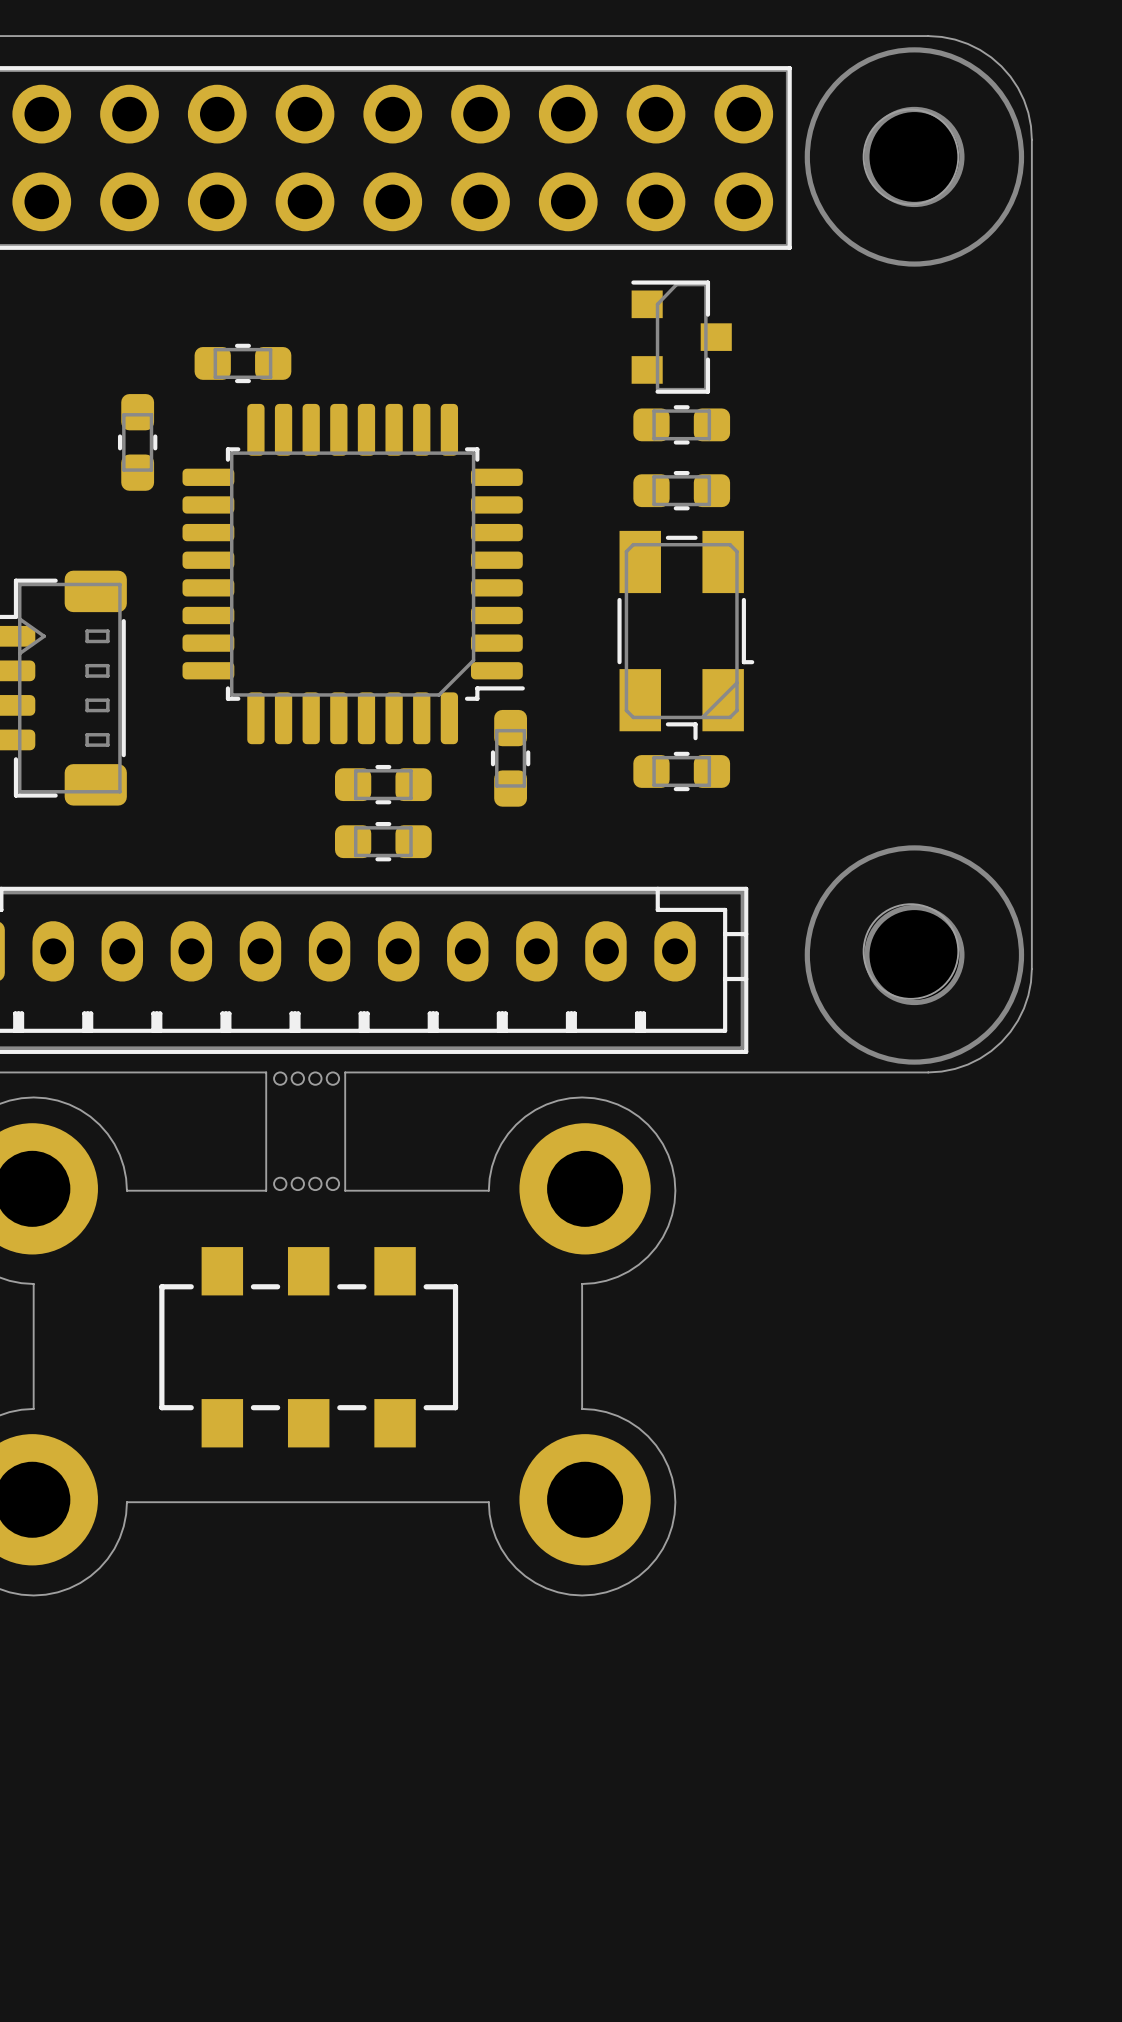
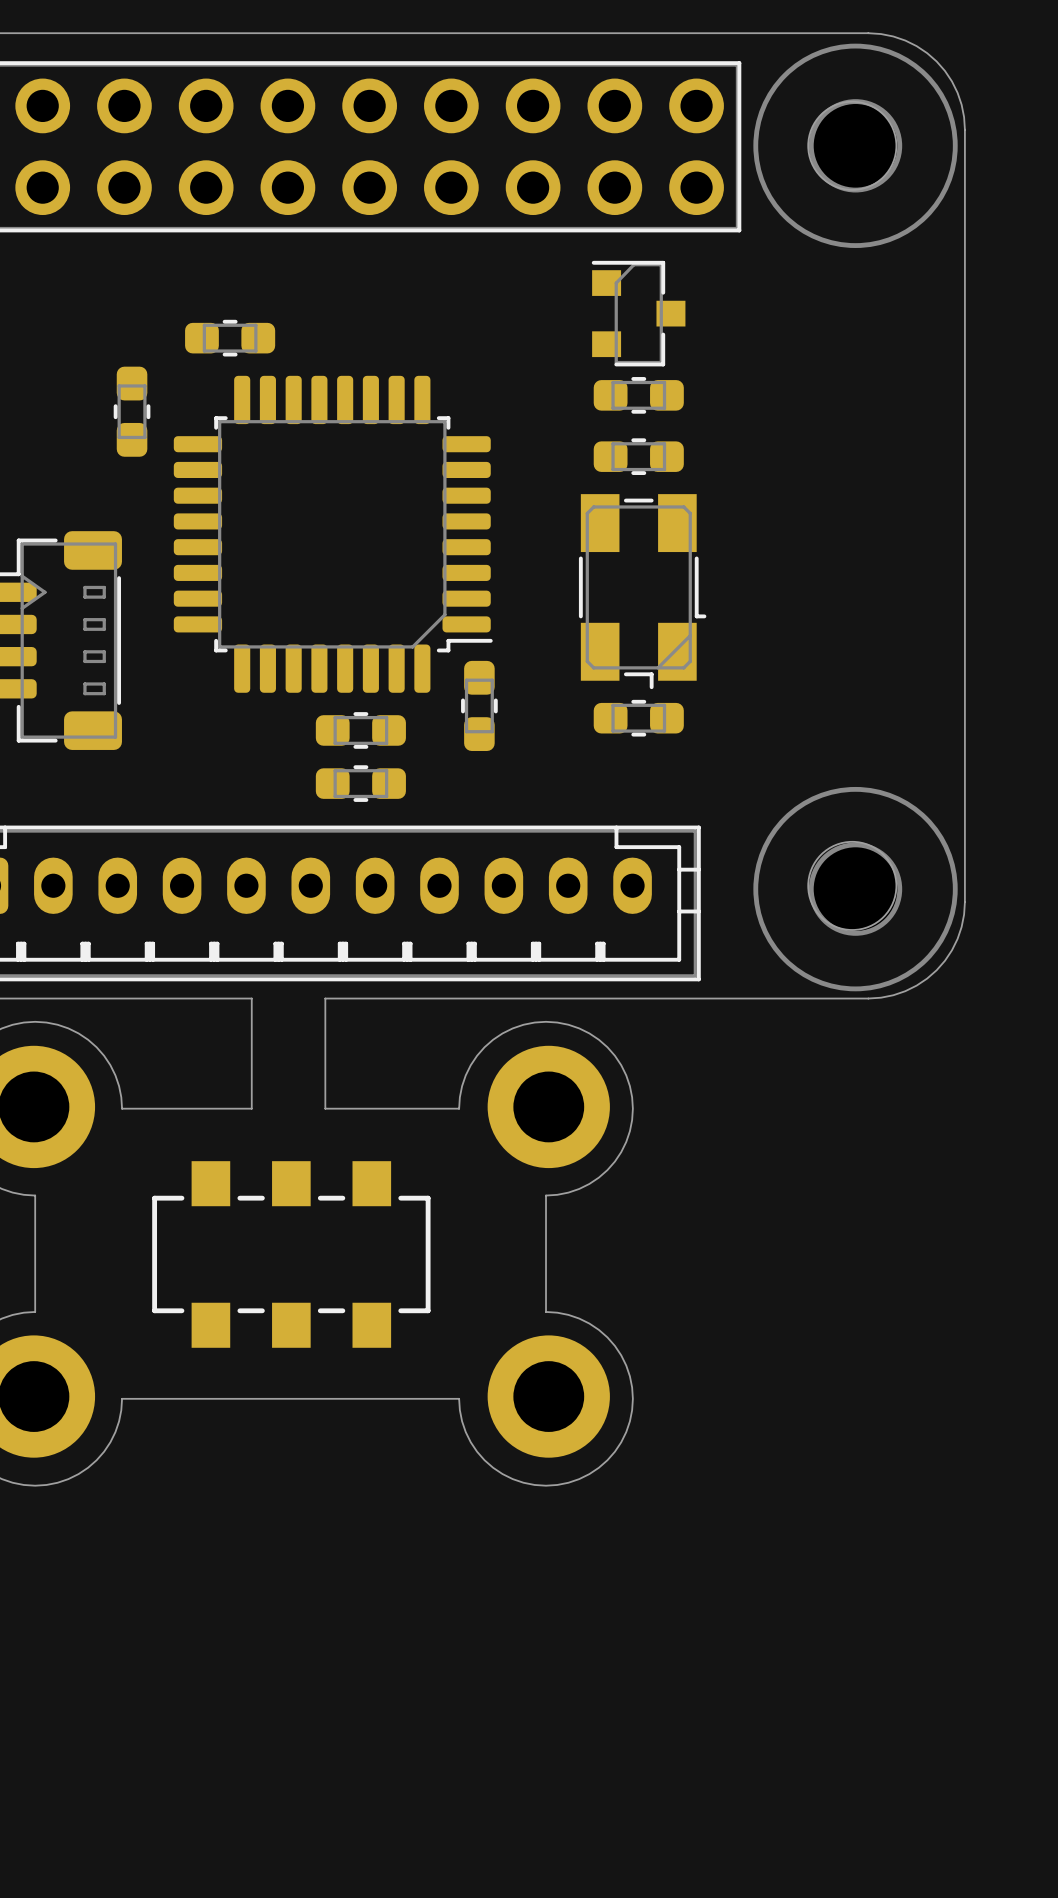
round board edge: [273, 1071, 288, 1086] -> none
round board edge: [290, 1071, 305, 1086] -> none
round board edge: [308, 1071, 323, 1086] -> none
round board edge: [325, 1071, 340, 1086] -> none
round board edge: [273, 1176, 288, 1191] -> none
round board edge: [290, 1176, 305, 1191] -> none
round board edge: [308, 1176, 323, 1191] -> none
round board edge: [325, 1176, 340, 1191] -> none

